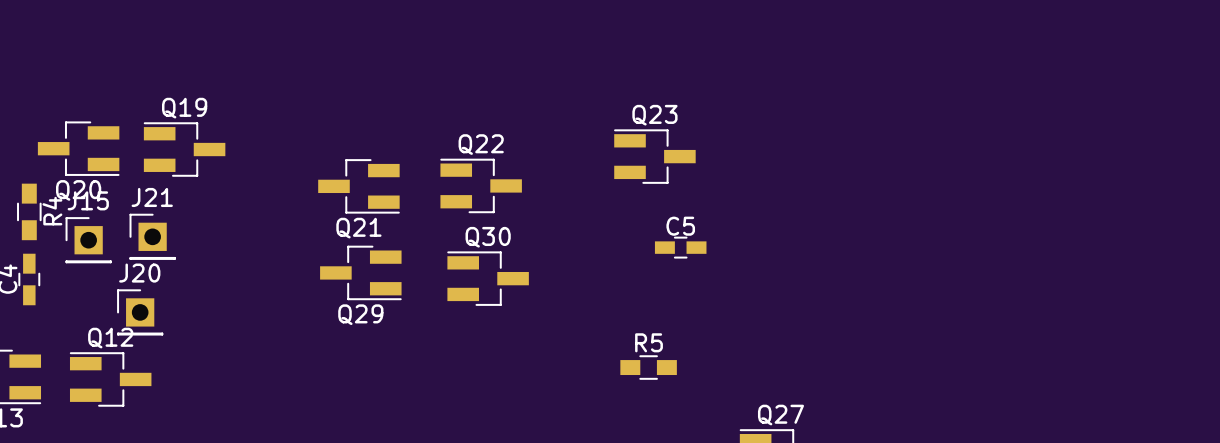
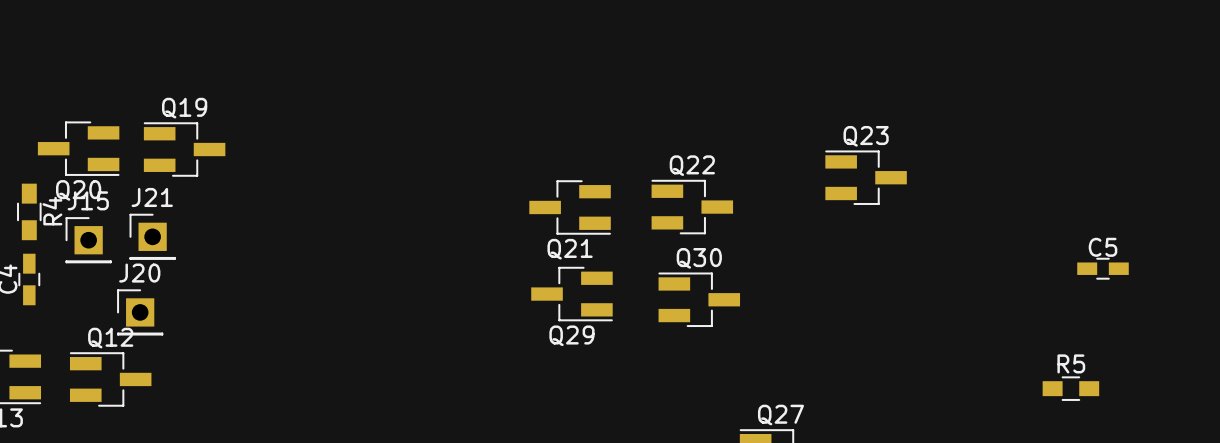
Q23 position: (654, 156) -> (866, 177)
Q22 position: (481, 185) -> (692, 207)
Q21 position: (359, 186) -> (570, 207)
C5 position: (680, 247) -> (1103, 268)
Q29 position: (360, 272) -> (572, 294)
Q30 position: (488, 278) -> (699, 299)
R5 position: (648, 367) -> (1070, 388)

